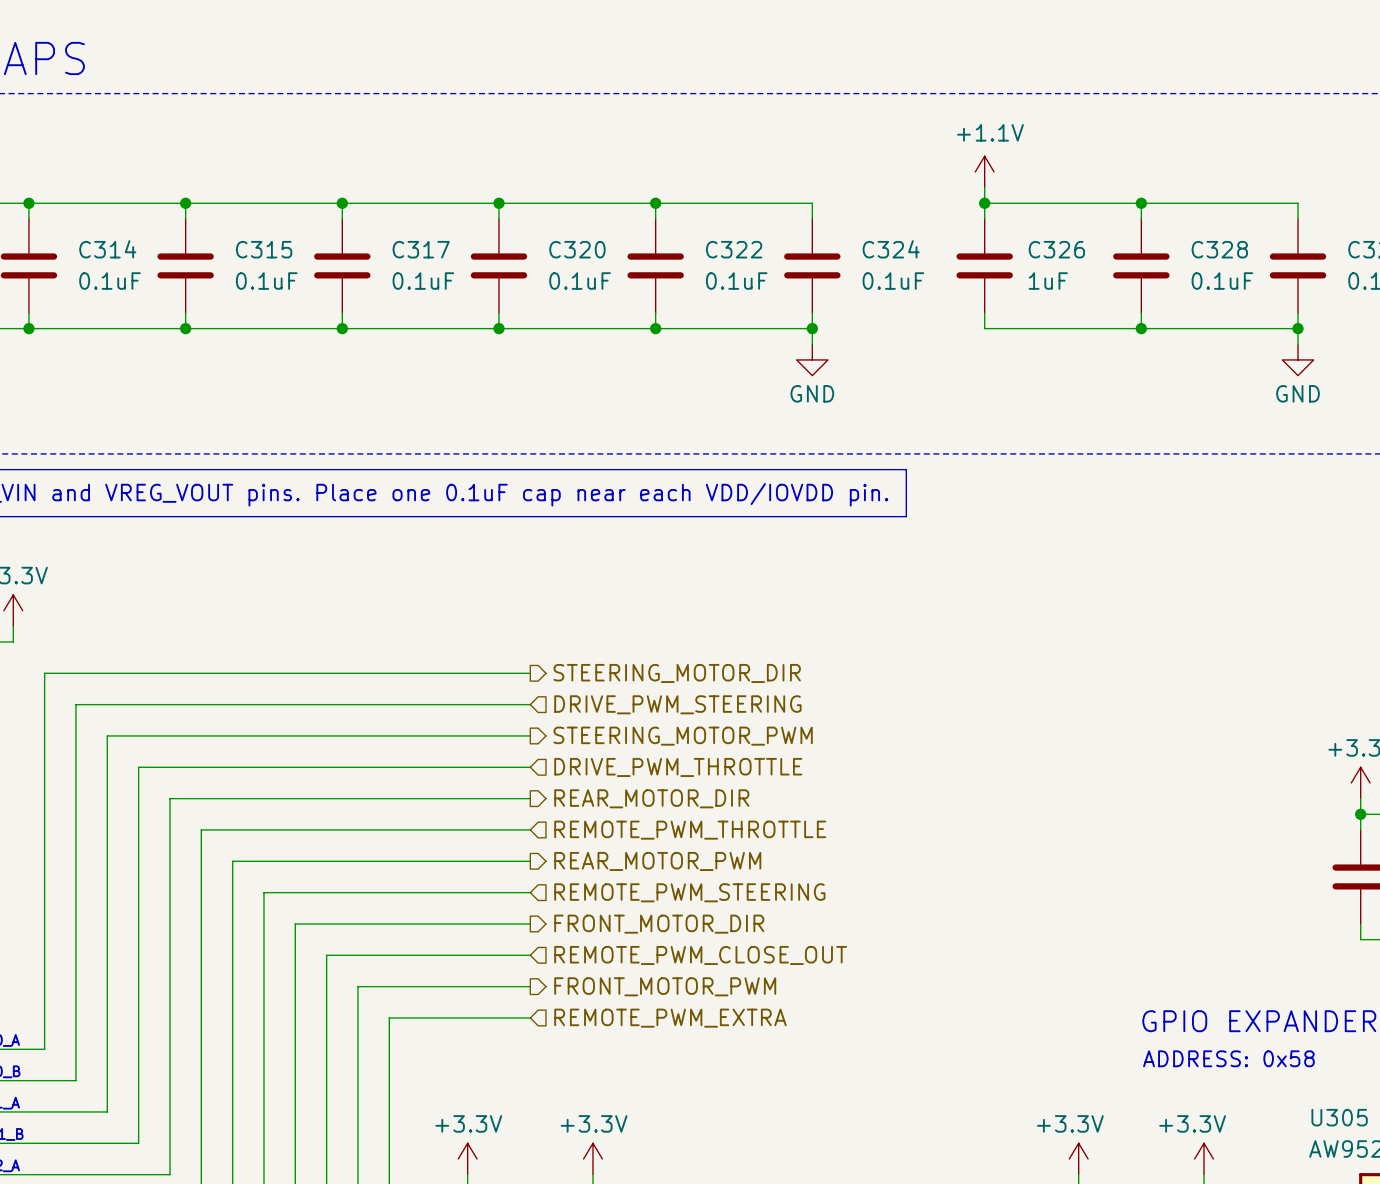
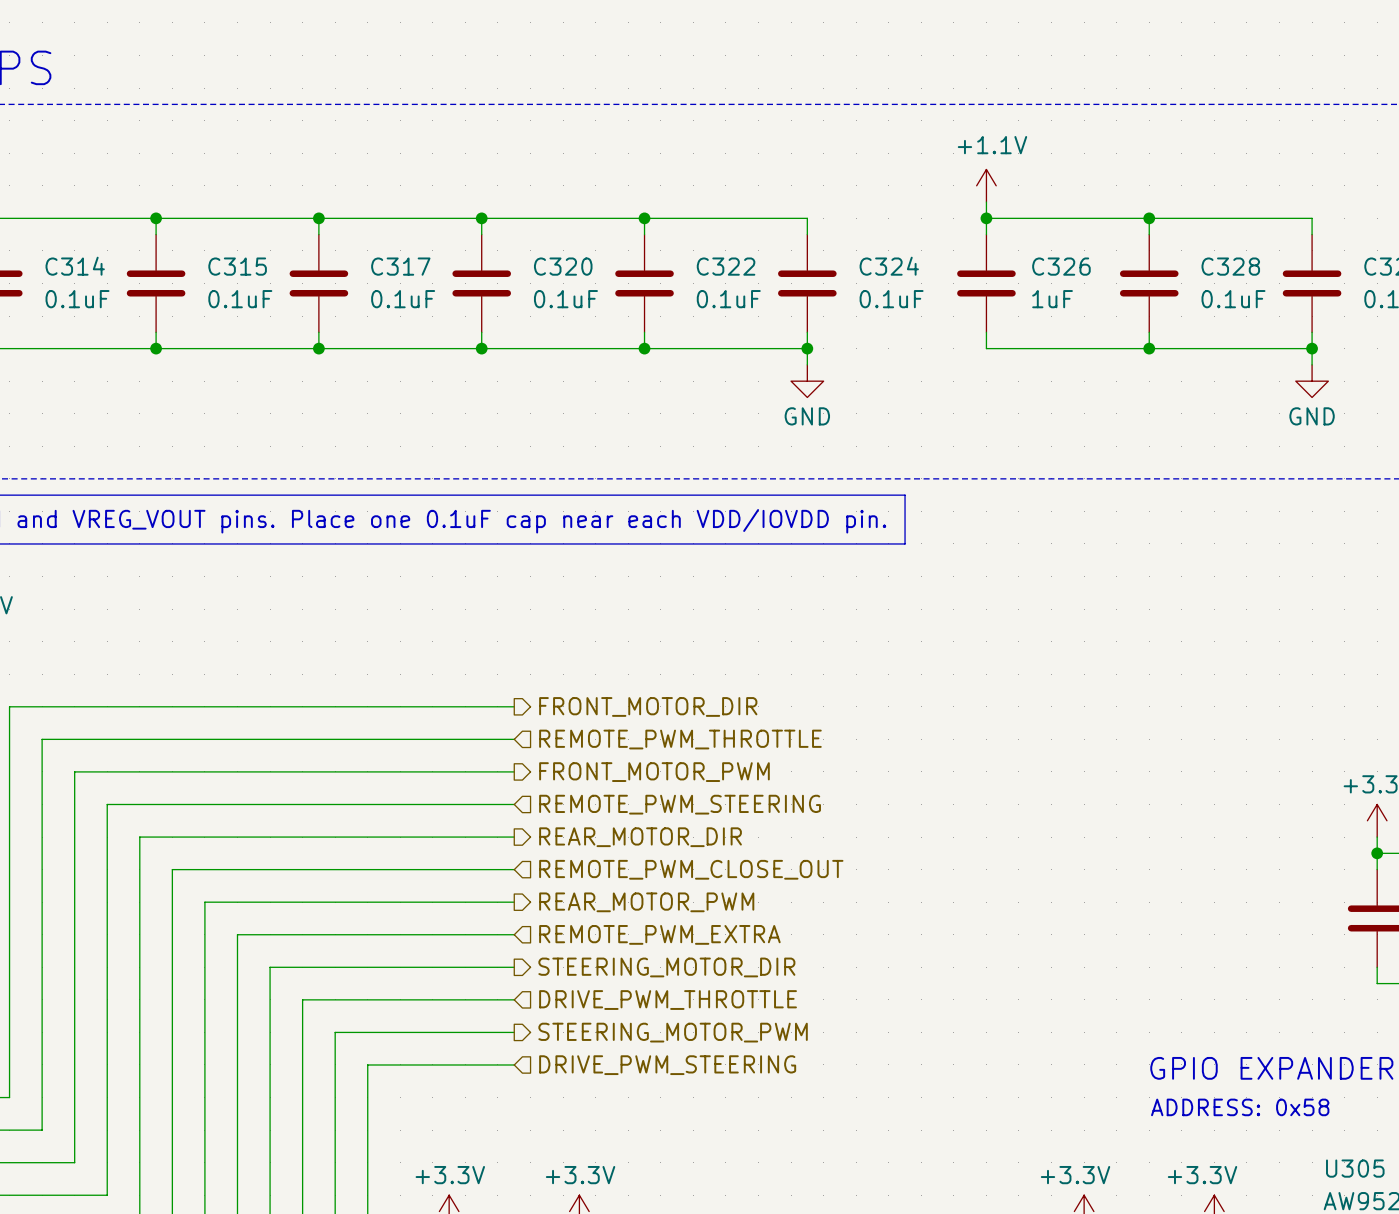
hierarchical label: STEERING_MOTOR_DIR (677, 673) -> FRONT_MOTOR_DIR (648, 706)
hierarchical label: DRIVE_PWM_STEERING (677, 704) -> REMOTE_PWM_THROTTLE (680, 739)
hierarchical label: STEERING_MOTOR_PWM (683, 736) -> FRONT_MOTOR_PWM (654, 772)
hierarchical label: DRIVE_PWM_THROTTLE (678, 767) -> REMOTE_PWM_STEERING (680, 804)
hierarchical label: REMOTE_PWM_THROTTLE (690, 830) -> REMOTE_PWM_CLOSE_OUT (691, 869)
hierarchical label: REMOTE_PWM_STEERING (689, 892) -> REMOTE_PWM_EXTRA (659, 934)
hierarchical label: FRONT_MOTOR_DIR (659, 924) -> STEERING_MOTOR_DIR (666, 967)
hierarchical label: REMOTE_PWM_CLOSE_OUT (700, 955) -> DRIVE_PWM_THROTTLE (668, 1000)
hierarchical label: FRONT_MOTOR_PWM (665, 986) -> STEERING_MOTOR_PWM (673, 1032)
hierarchical label: REMOTE_PWM_EXTRA (670, 1018) -> DRIVE_PWM_STEERING (667, 1065)

